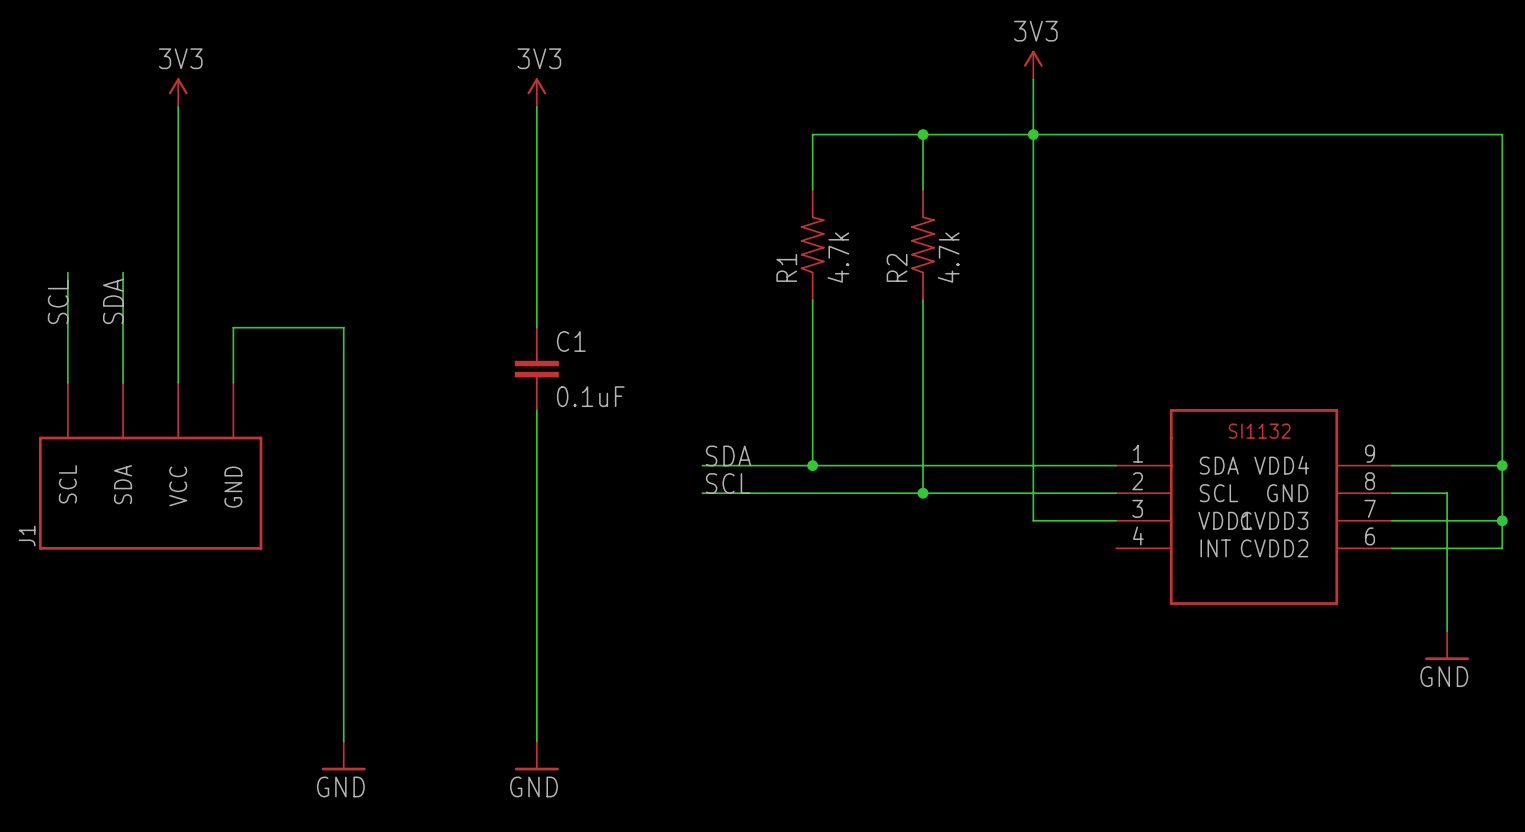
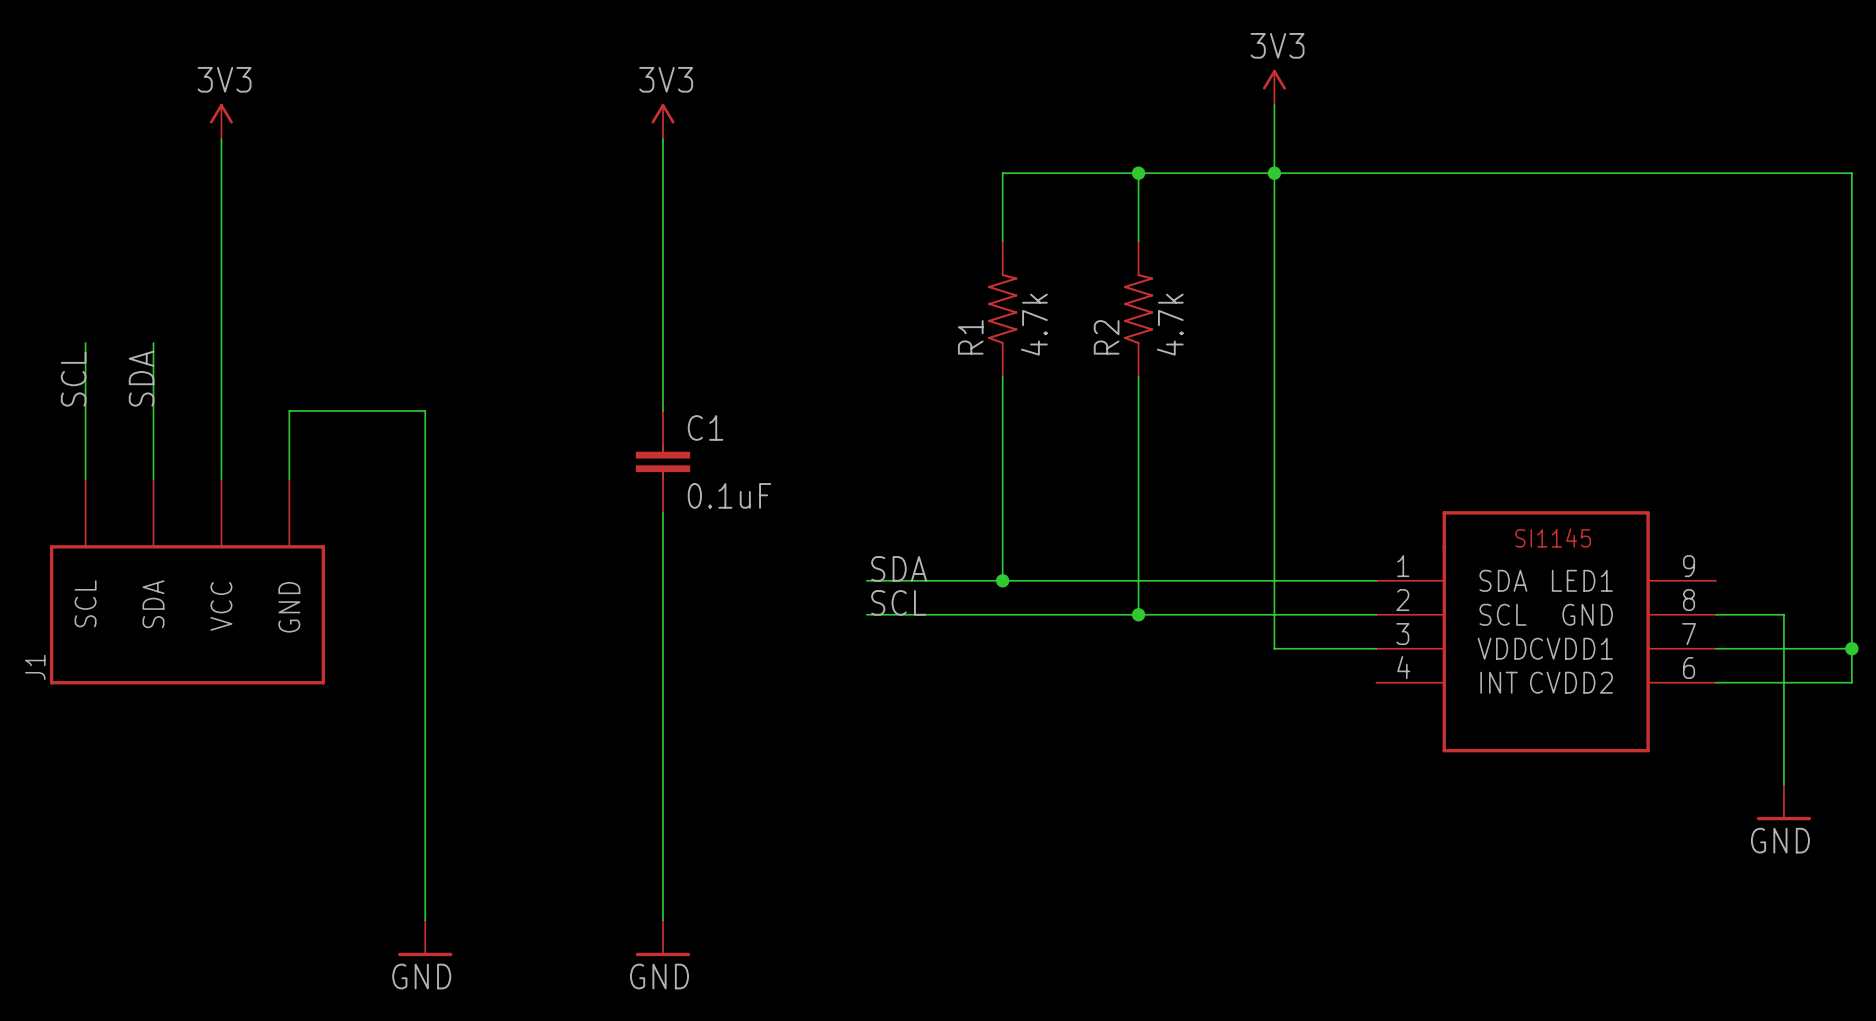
part text: SI1132 (1259, 431) -> SI1145 (1553, 537)
part pin name: VDD4 (1281, 465) -> LED1 (1582, 580)
wire: (1391, 465) (1502, 465) -> none
junction: (1502, 465) -> none
part pin name: VDD1 (1225, 520) -> VDD (1502, 648)
part pin name: CVDD3 (1274, 520) -> CVDD1 (1571, 648)

